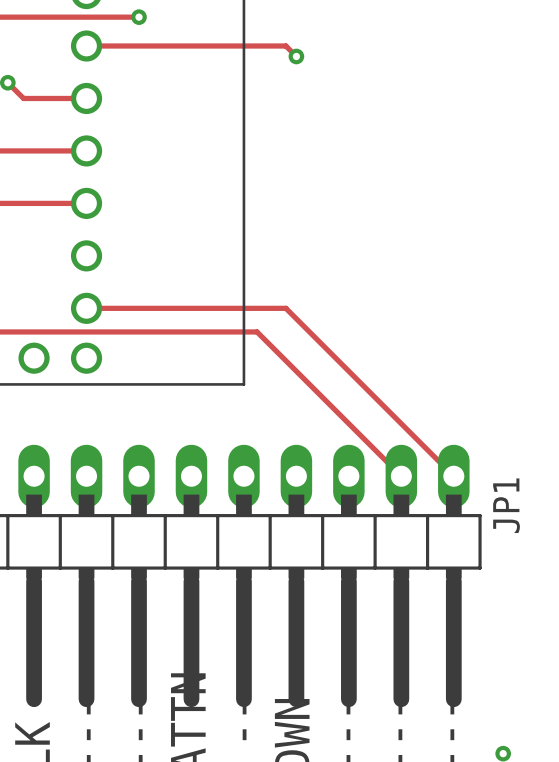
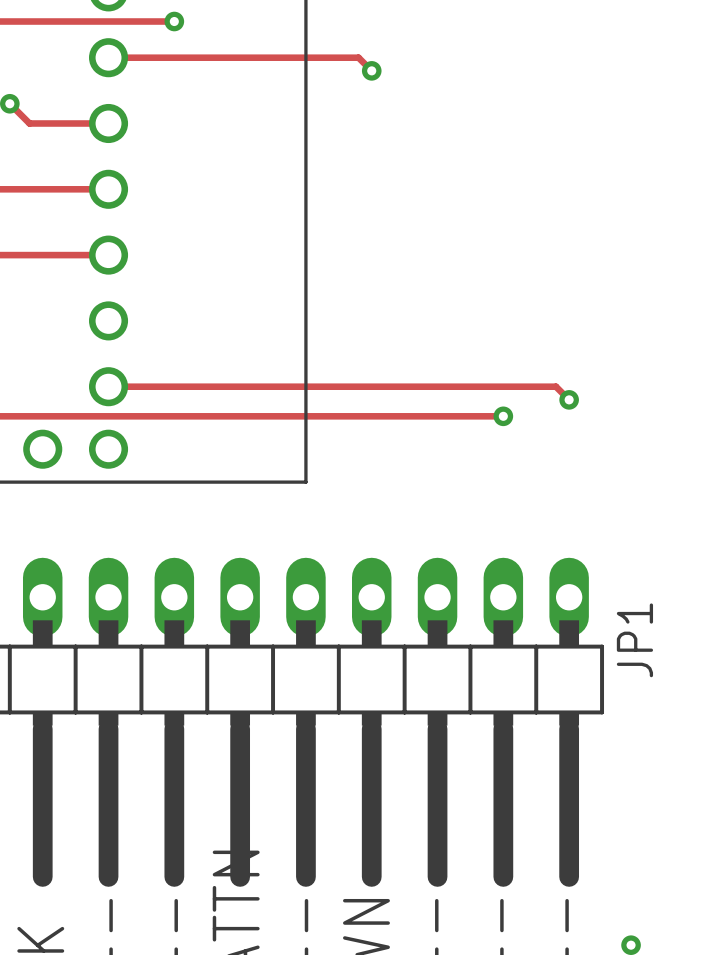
track: (285, 308) (453, 476) -> (358, 386) (555, 386) (569, 399)
via: none -> (569, 399)
track: (257, 331) (401, 476) -> (322, 416) (503, 416)
via: none -> (503, 416)

